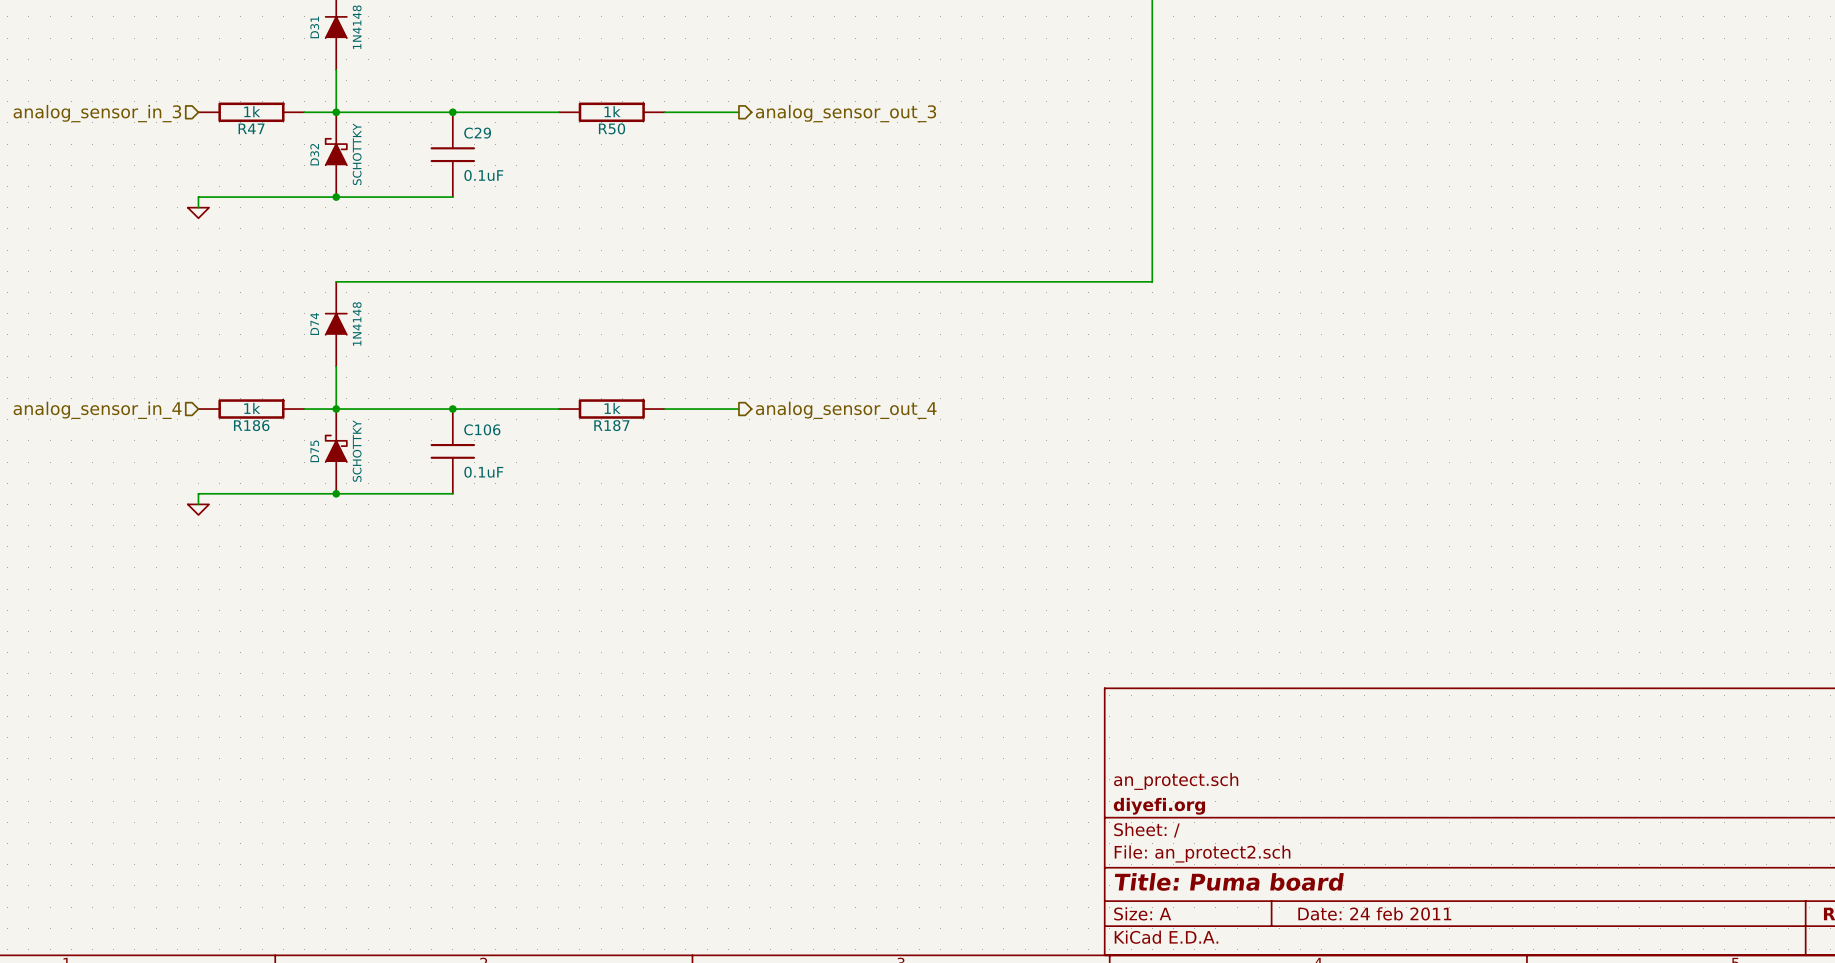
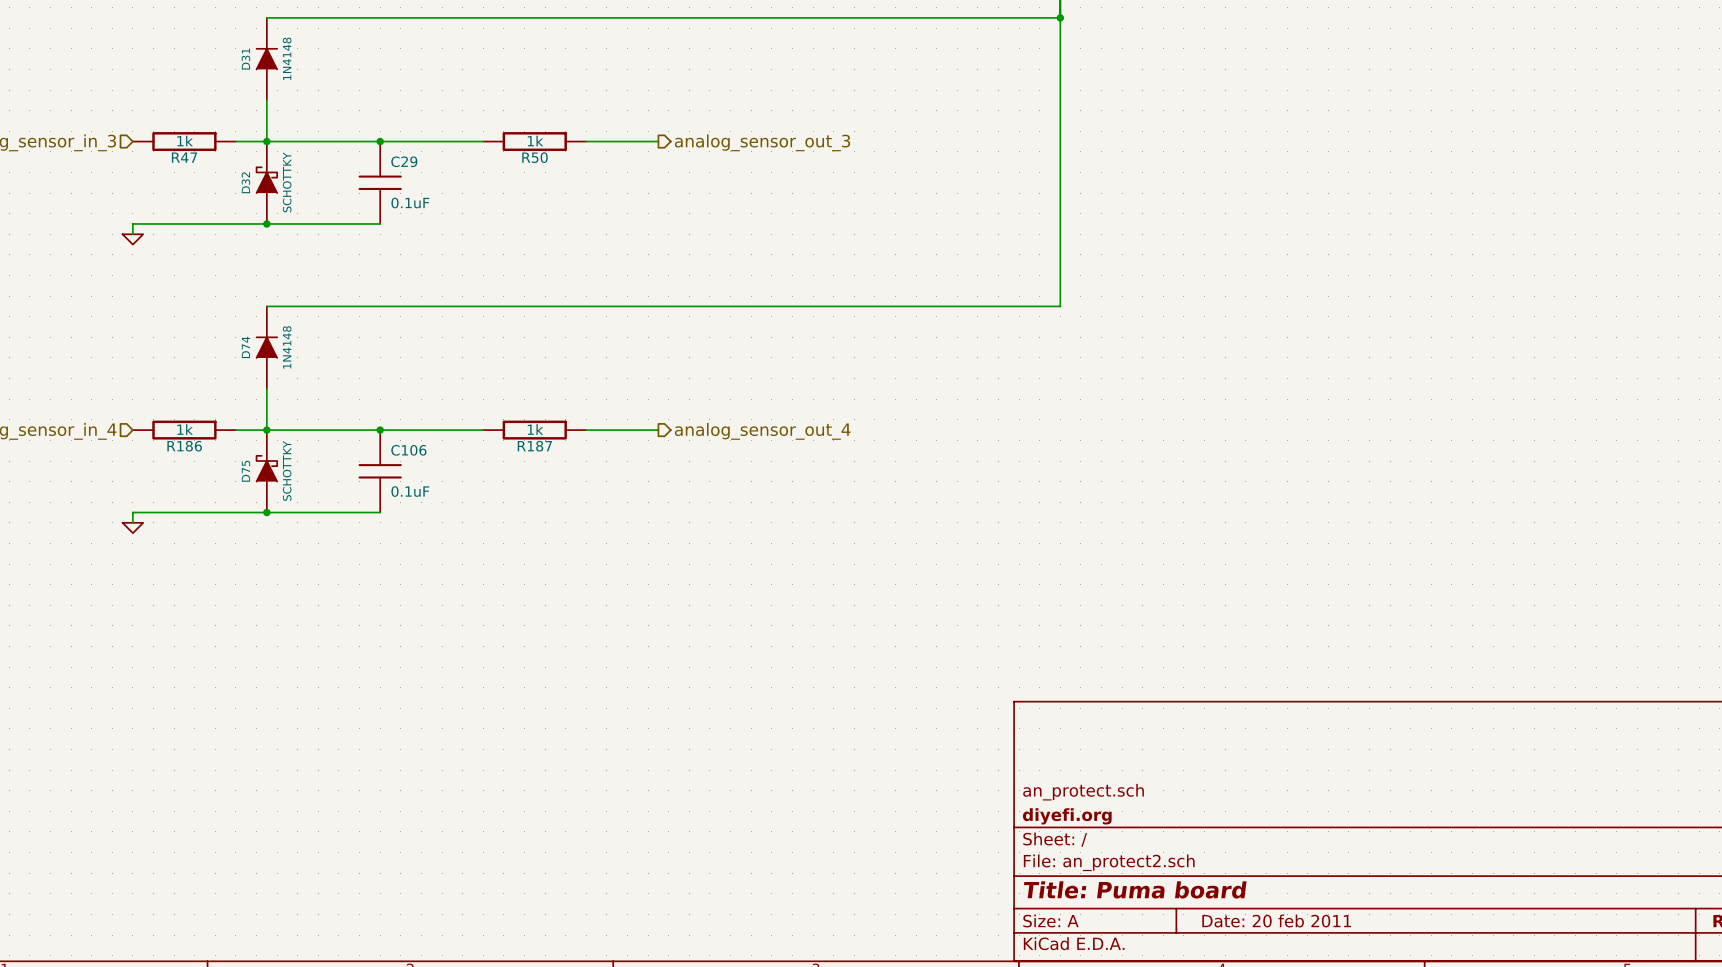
title block: Date: 24 feb 2011 (1374, 913) -> Date: 20 feb 2011 (1276, 920)

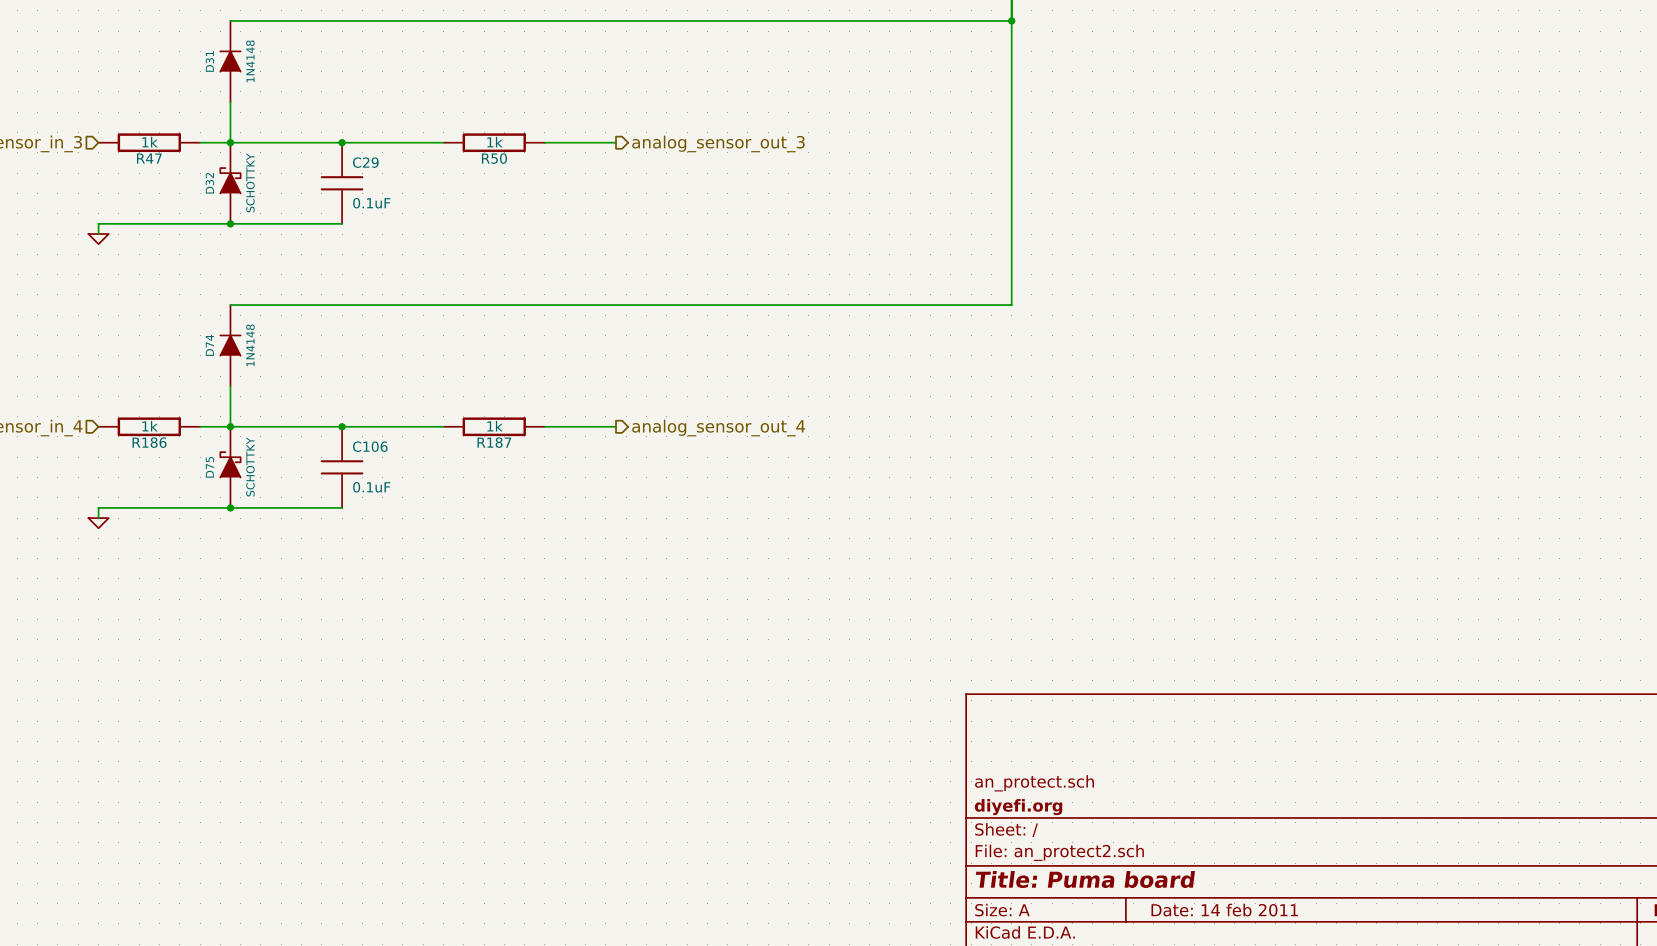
title block: Date: 20 feb 2011 (1276, 920) -> Date: 14 feb 2011 (1224, 910)

